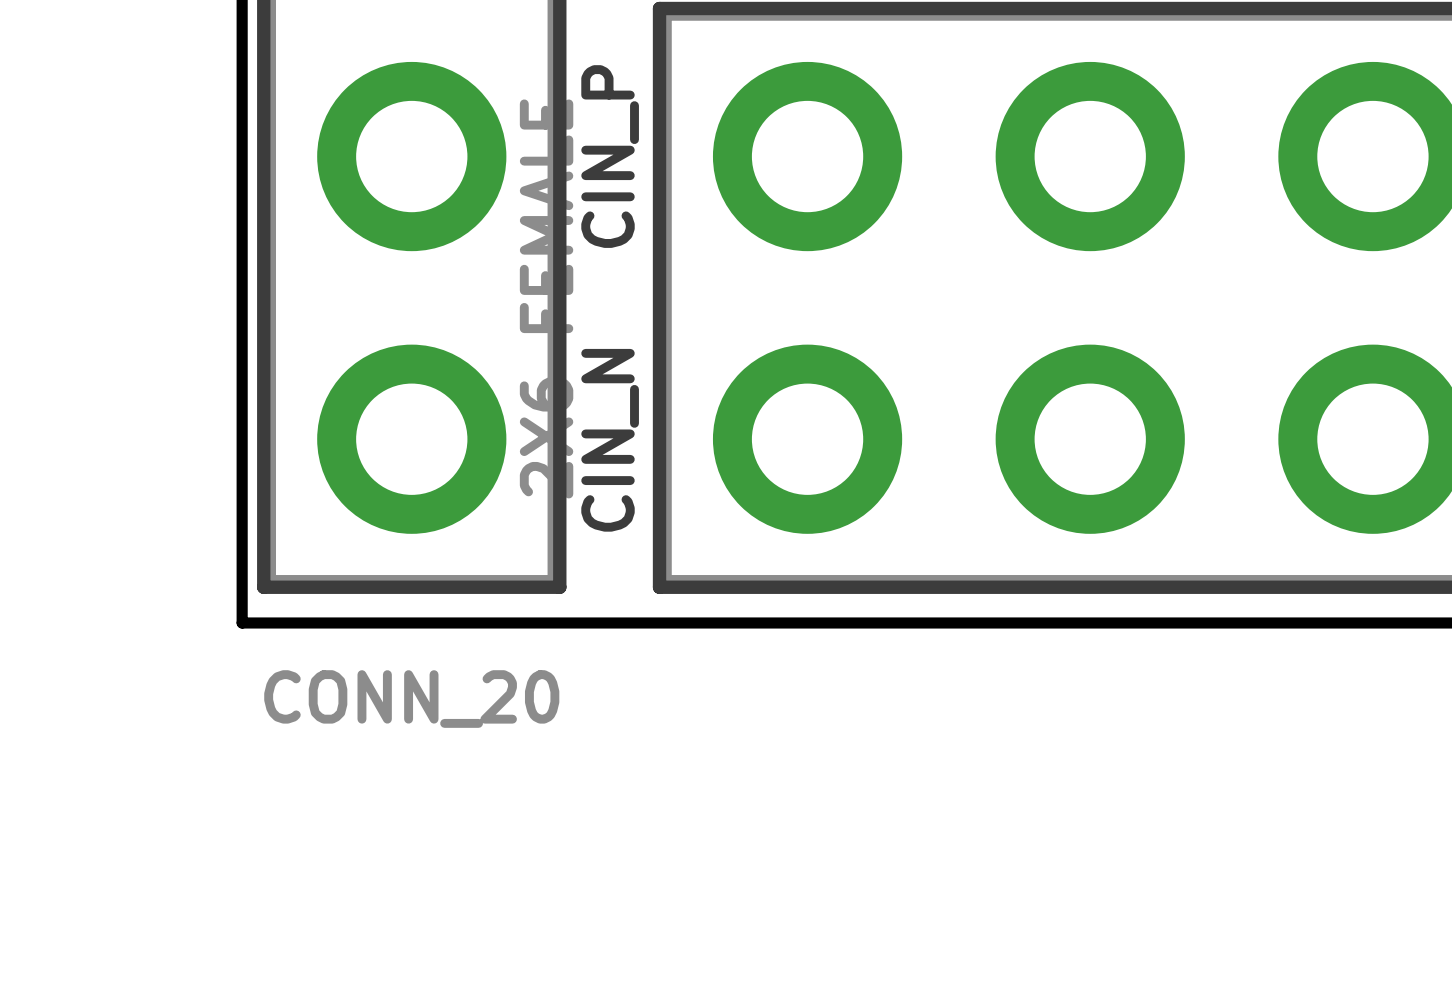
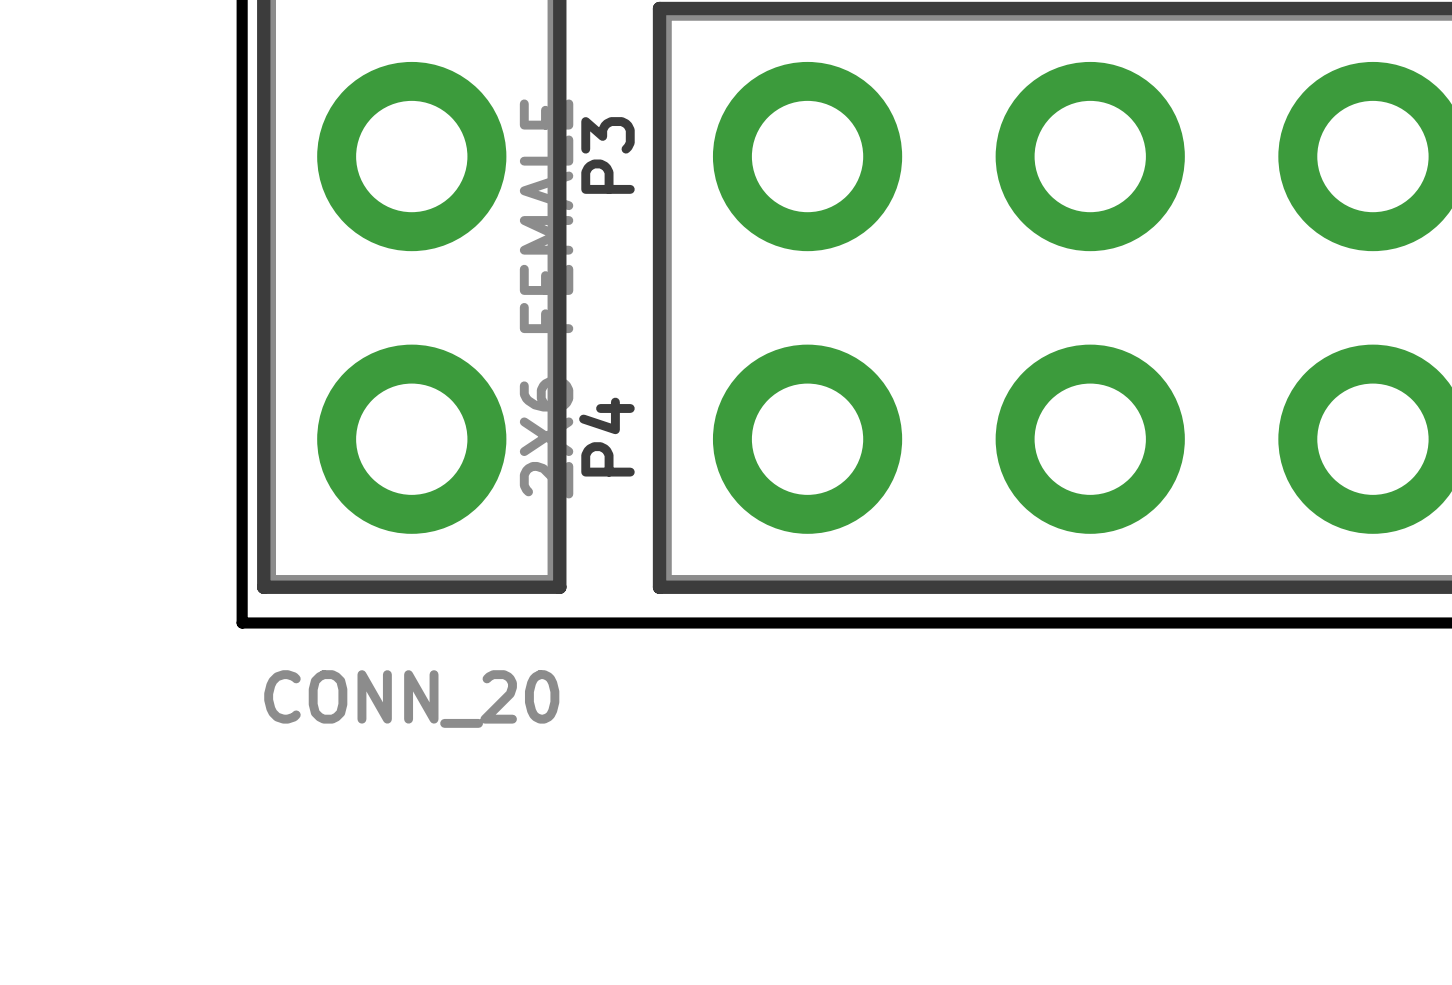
text: CIN_P (610, 156) -> P3 (607, 155)
text: CIN_N (610, 440) -> P4 (606, 437)

